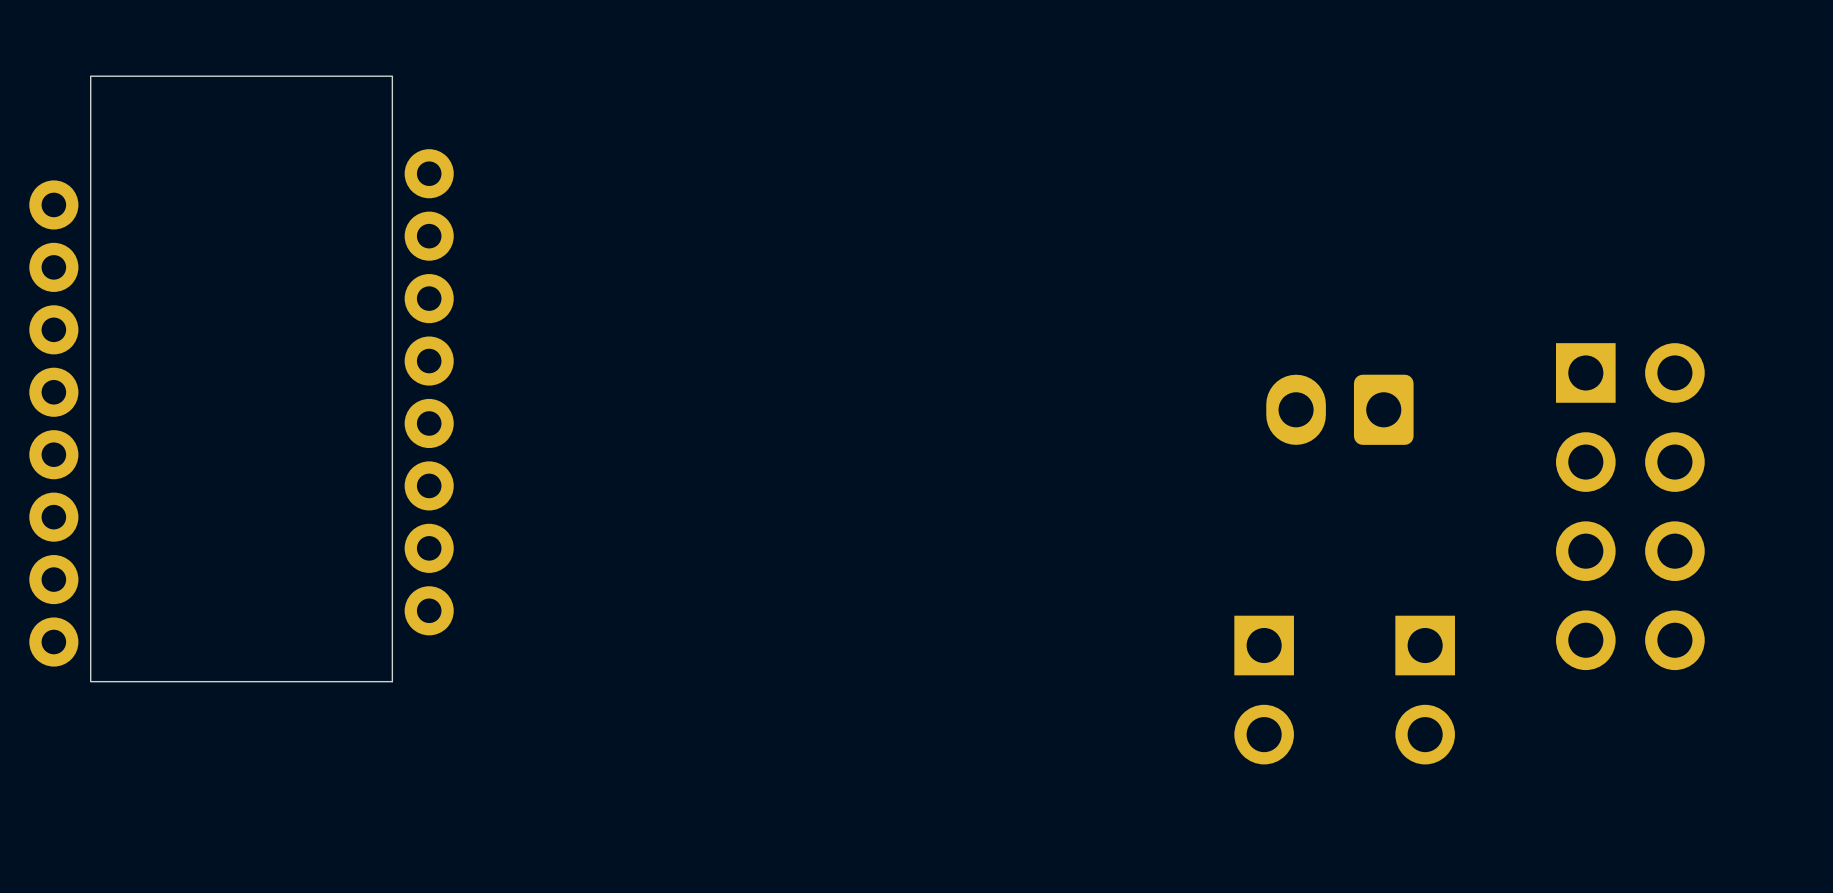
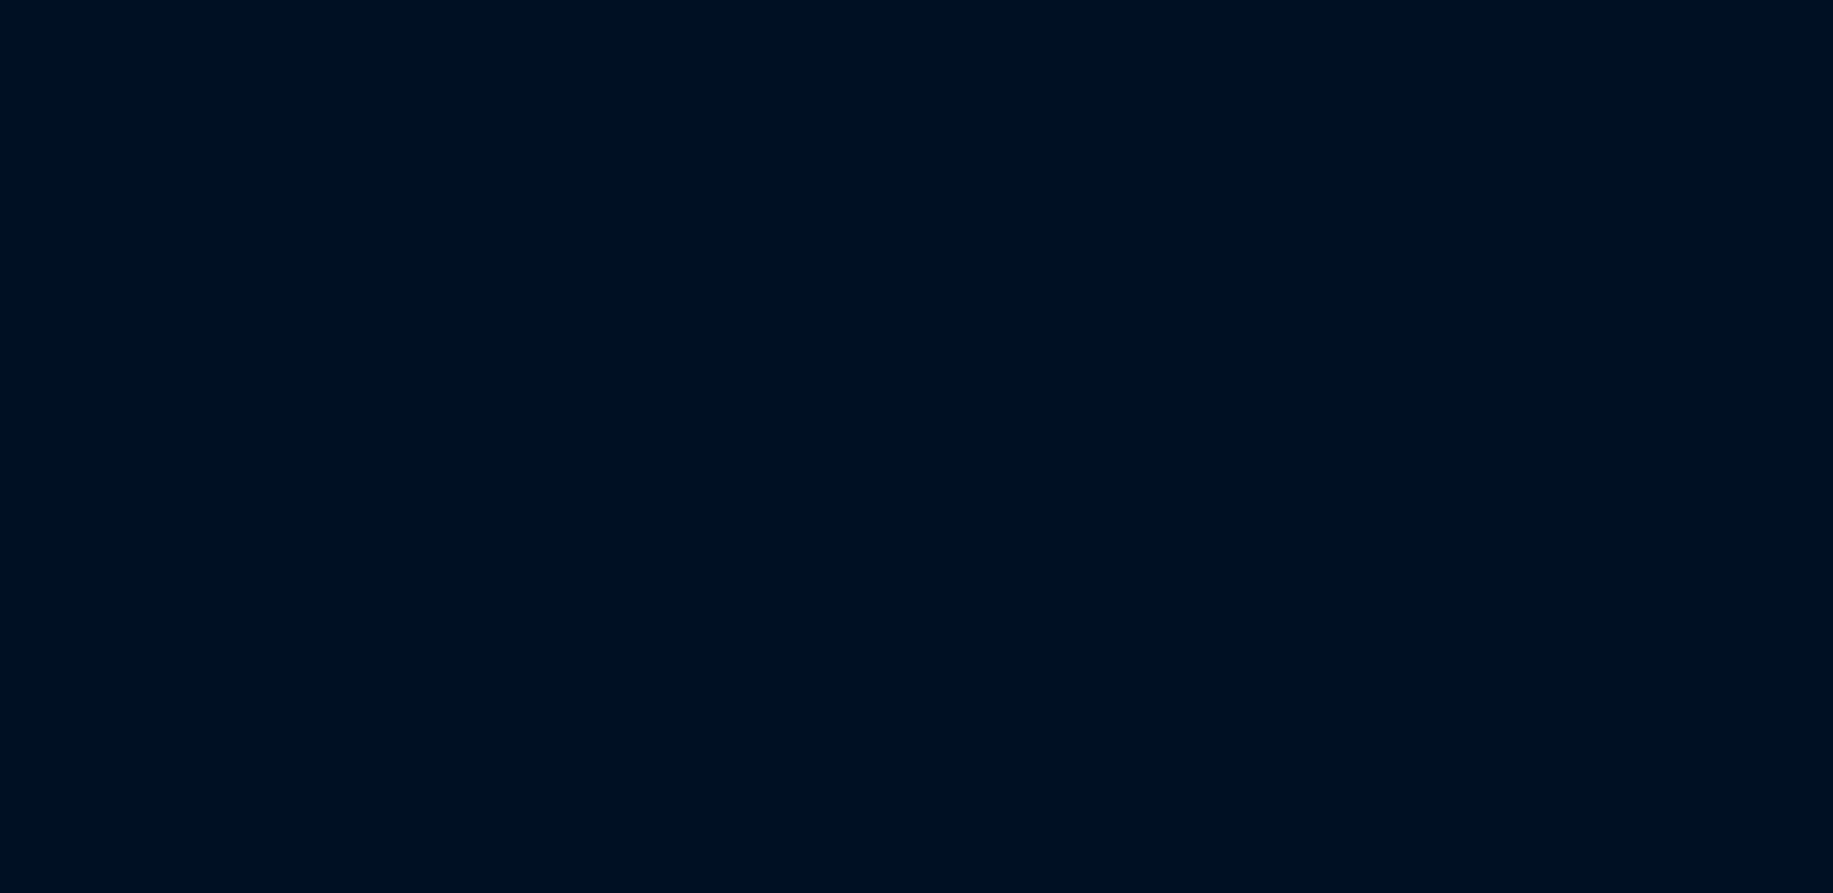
part: (241, 378) -> none
part: (1339, 409) -> none
part: (1630, 506) -> none
part: (1264, 690) -> none
part: (1425, 690) -> none

